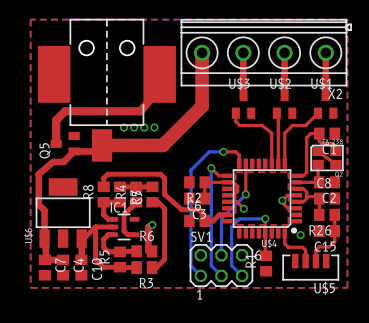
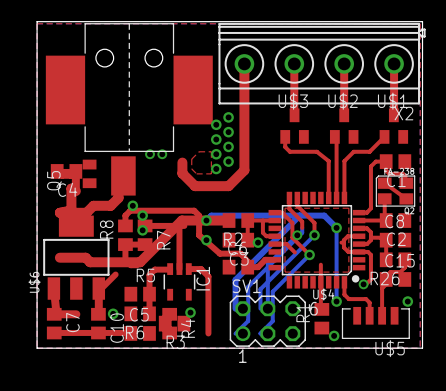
board edge: none -> (37, 21) (37, 348) (422, 348) (422, 21) (37, 21)
top track width: thick (202, 54) (202, 106) -> thin (244, 66) (244, 128)
top track: (159, 74) (151, 97) (140, 111) (65, 111) (56, 120) (56, 143) -> none
via: none -> (228, 117)
via: none -> (216, 124)
top track: (202, 106) (162, 145) (102, 145) -> (244, 128) (244, 170) (228, 186) (195, 186) (182, 173) (182, 162)
via: none -> (228, 132)
via: none -> (216, 139)
via: none -> (228, 146)
top zone outline: none -> (199, 151) (191, 159) (191, 168) (196, 173) (211, 173) (211, 151) (199, 151)
via: (144, 127) -> none
via: (154, 127) -> none
via: none -> (216, 154)
via: none -> (228, 161)
via: none -> (216, 168)
top track: none -> (75, 171) (75, 191) (71, 188) (71, 210) (59, 212) (86, 212) (93, 205) (110, 205) (118, 198) (118, 173)
top track: (102, 145) (100, 141) (99, 145) (93, 151) (74, 151) (63, 162) (52, 162) (38, 174) (38, 204) (44, 210) (44, 238) -> none
top track: (223, 151) (235, 151) (239, 155) (239, 163) -> (302, 227) (302, 221) (289, 208) (289, 198)
bottom track: (223, 151) (209, 151) (191, 170) (191, 266) (200, 275) -> none
via: (223, 151) -> none
top track: (211, 168) (219, 175) (227, 175) -> (309, 254) (292, 237) (292, 222) (282, 212) (274, 212)
bottom track: (211, 168) (211, 265) (221, 275) -> none
via: (211, 168) -> none
via: none -> (132, 205)
top track: (245, 170) (245, 194) -> (297, 205) (314, 222) (314, 235)
via: none -> (142, 215)
bottom track: none -> (299, 215) (235, 279) (235, 308)
bottom track: none -> (206, 220) (211, 215) (324, 215) (336, 227) (336, 301)
via: none -> (206, 220)
top track: none -> (224, 220) (181, 220) (140, 262) (90, 262) (85, 257) (59, 257)
top track: (227, 182) (233, 182) (237, 186) (237, 191) (233, 195) (227, 195) -> (262, 220) (262, 232) (266, 236) (274, 236)
top track: none -> (178, 224) (179, 269)
bottom track: none -> (302, 227) (302, 232) (248, 286) (248, 320) (235, 333)
via: none -> (336, 227)
via: none -> (142, 230)
R4 name position: R4 (120, 191) -> R4 (188, 328)
R4 position: (136, 194) -> (169, 323)
C5 rotation: 0° (152, 194) -> 90° clockwise (140, 333)
C5 position: (152, 194) -> (140, 333)
bottom track: none -> (314, 235) (260, 289) (260, 308)
via: none -> (314, 235)
via: none -> (206, 240)
via: none -> (258, 242)
via: (282, 200) -> none
top track: (136, 202) (124, 214) (124, 231) (127, 234) (134, 234) -> none
top track: (152, 202) (158, 202) (164, 208) (164, 259) (156, 267) (152, 267) -> none
via: (243, 208) -> none
top track: none -> (359, 251) (368, 251) (370, 254) (370, 279) (366, 284)
bottom track: none -> (309, 254) (272, 291) (272, 321) (260, 333)
via: none -> (309, 254)
bottom track: (265, 218) (239, 218) (231, 226) (231, 265) (241, 275) -> none
via: (265, 218) -> none
top track: (334, 221) (334, 241) (329, 246) (319, 246) (315, 250) -> (404, 267) (400, 272) (390, 272) (386, 276) (386, 284) (382, 288) (382, 302)
top track: none -> (170, 269) (154, 269) (149, 275) (149, 313)
top track: none -> (188, 269) (201, 269) (208, 276) (208, 333)
top track: (152, 224) (148, 226) (148, 250) (152, 251) -> none
via: (152, 224) -> none
top track: (113, 226) (95, 226) (95, 259) (103, 267) (136, 267) -> none
IC1 rotation: 0° (124, 226) -> 90° clockwise (179, 281)
IC1 position: (124, 226) -> (179, 281)
top track: (113, 234) (108, 234) (103, 239) (103, 247) (108, 251) (136, 251) -> none
R6 name position: R6 (147, 235) -> R6 (135, 332)
C15 name position: C15 (325, 246) -> C15 (399, 260)
via: none -> (336, 301)
via: none -> (407, 301)
R6 position: (144, 251) -> (140, 313)
via: none -> (190, 312)
via: none -> (113, 313)
R5 rotation: 0° (119, 259) -> 90° clockwise (140, 294)
R5 position: (119, 259) -> (140, 294)
C4 rotation: 0° (63, 267) -> 90° clockwise (66, 171)
C4 position: (63, 267) -> (66, 171)
top track: none -> (51, 332) (130, 333)
via: none -> (334, 335)

